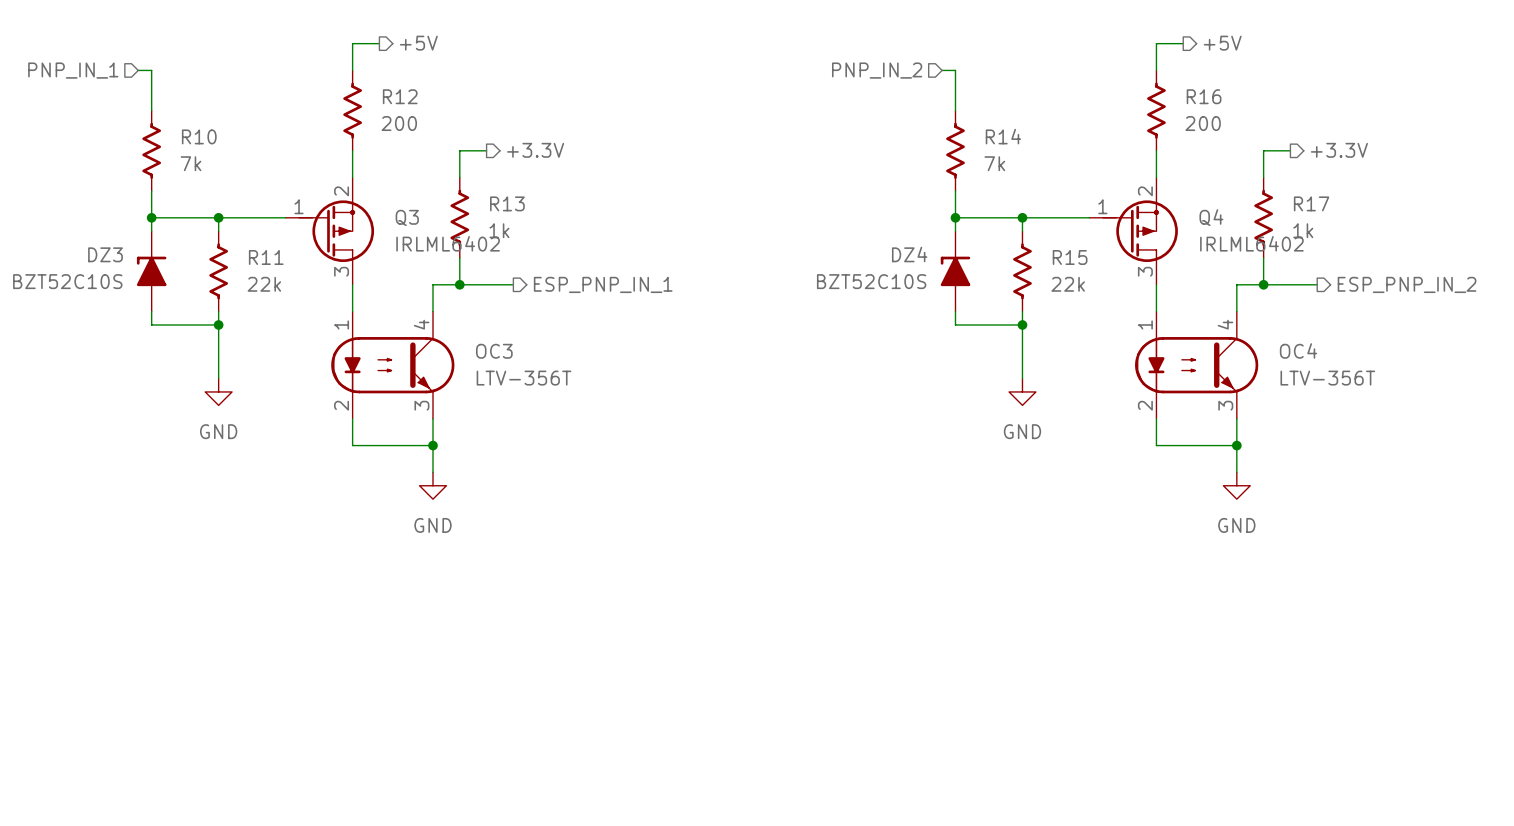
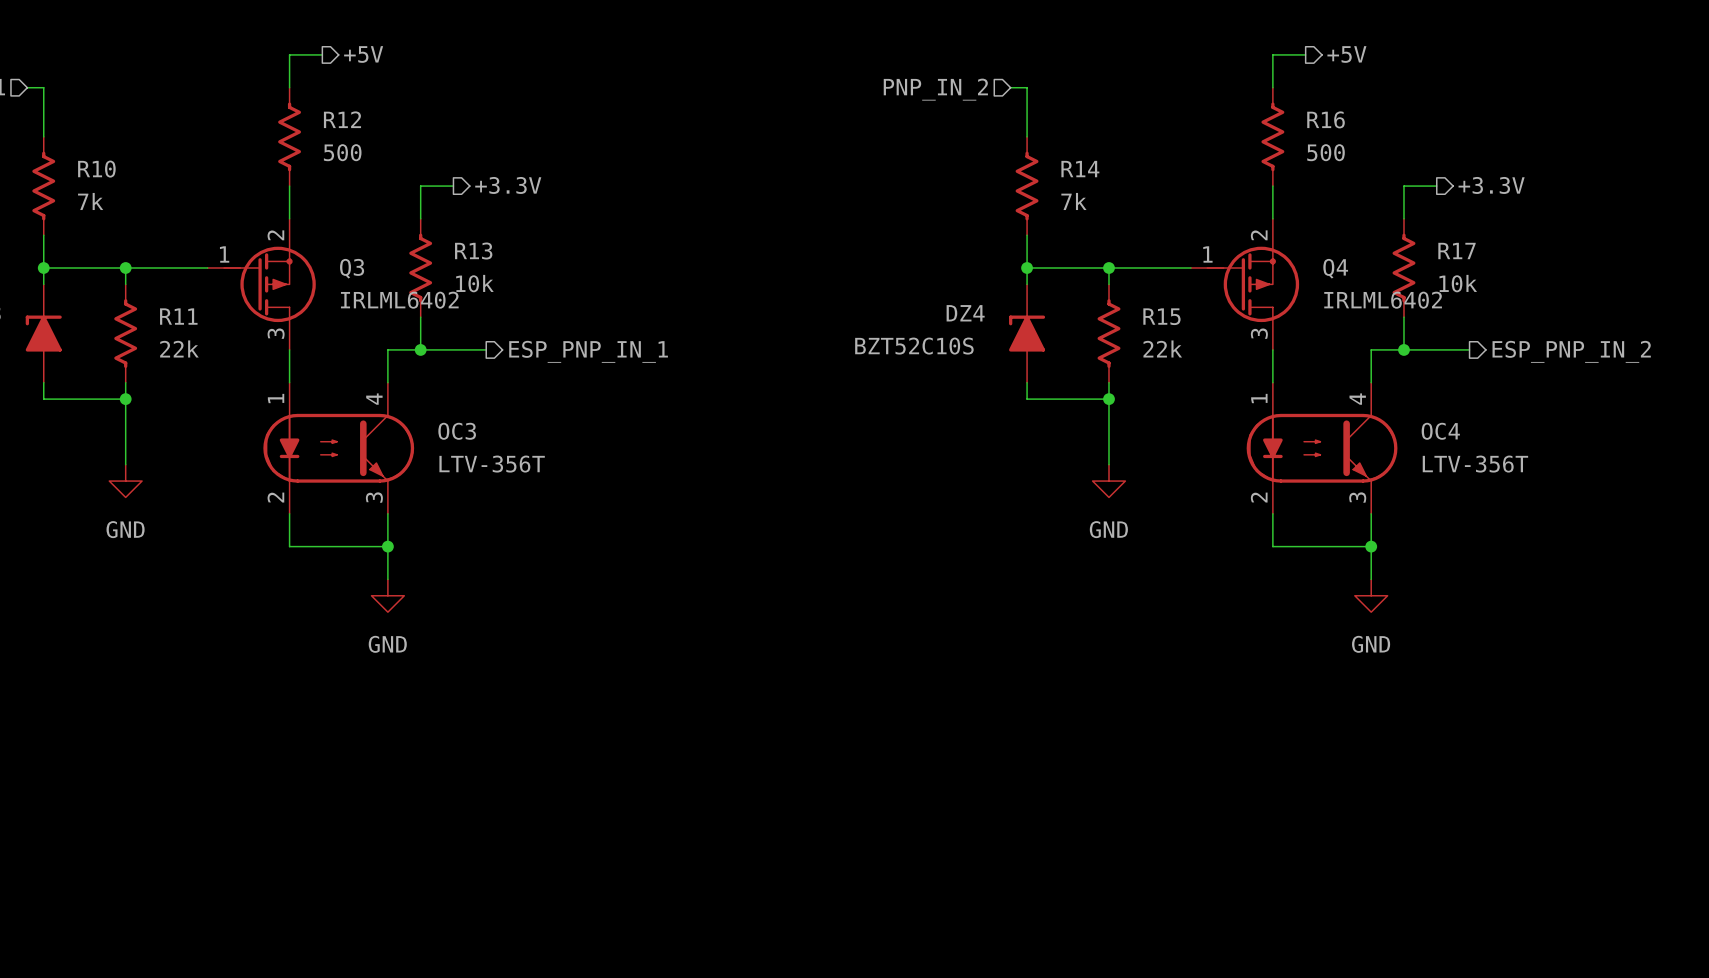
R12 value: 200 (399, 123) -> 500 (342, 152)
R16 value: 200 (1203, 123) -> 500 (1326, 152)
R13 value: 1k (499, 230) -> 10k (474, 283)
R17 value: 1k (1303, 230) -> 10k (1458, 283)

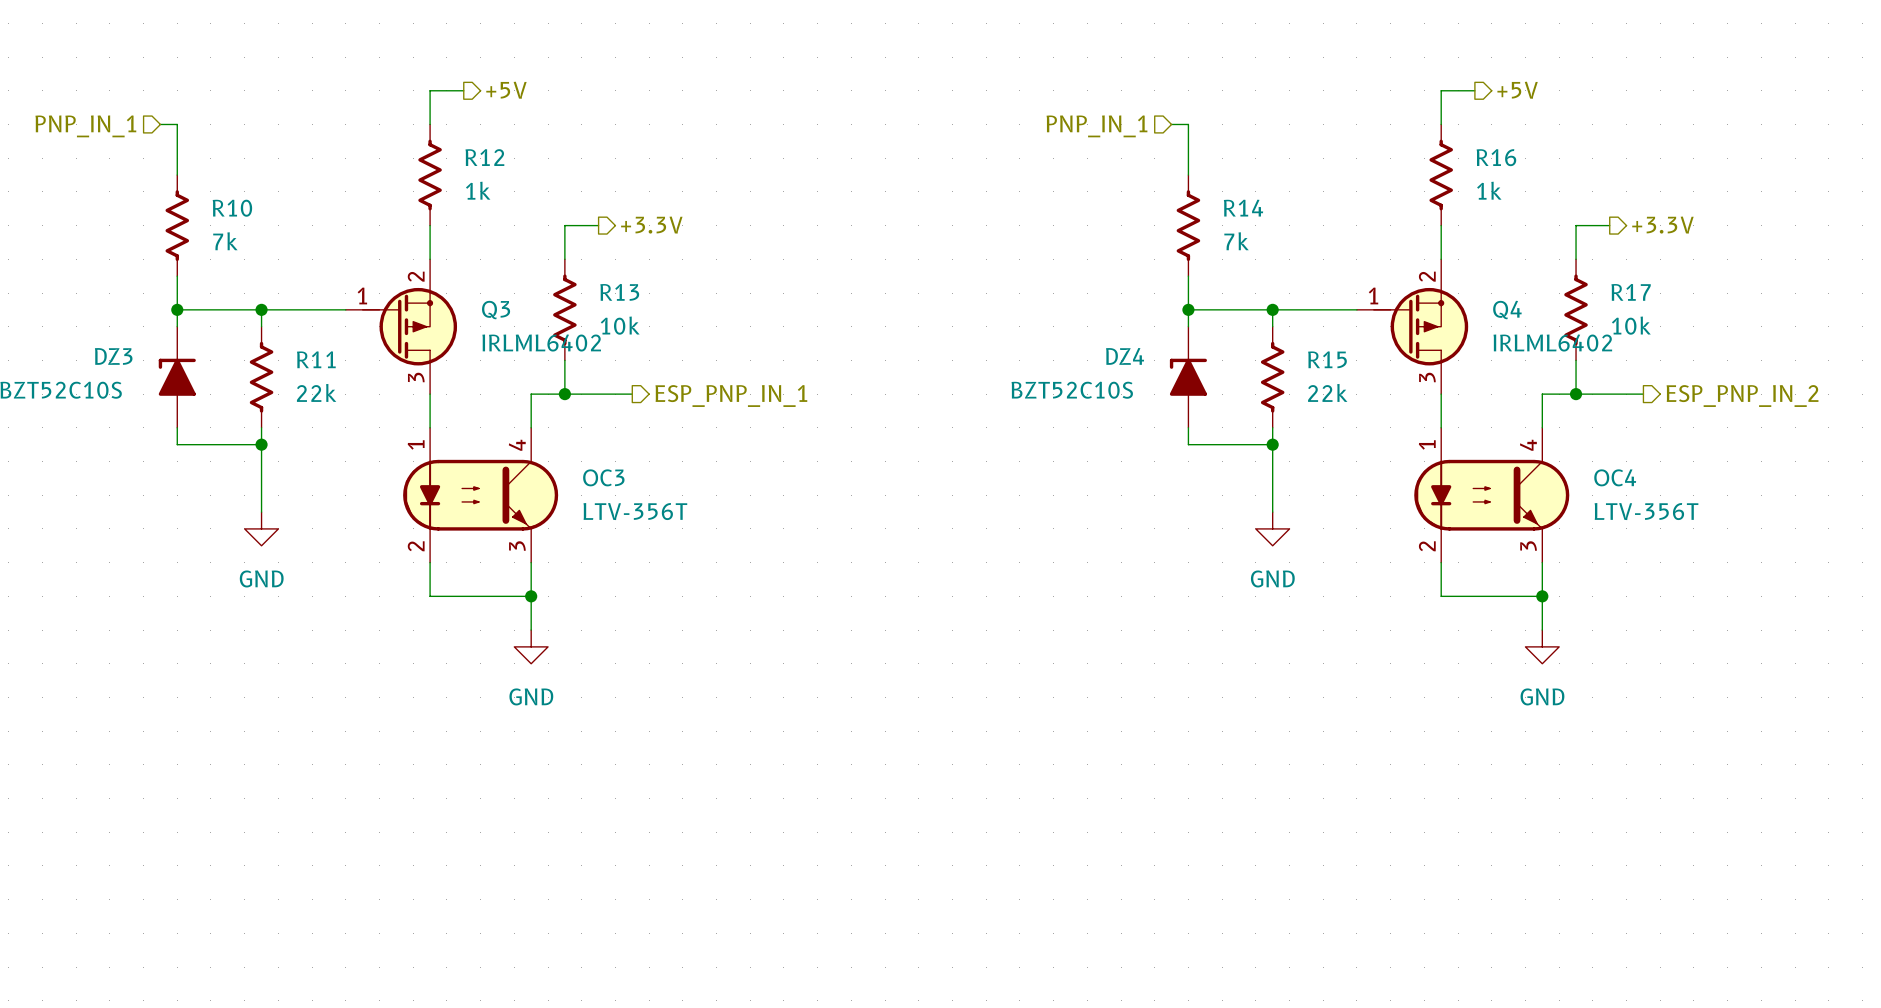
hierarchical label: PNP_IN_2 (935, 89) -> PNP_IN_1 (1096, 126)
R12 value: 500 (342, 152) -> 1k (478, 190)
R16 value: 500 (1326, 152) -> 1k (1489, 190)

